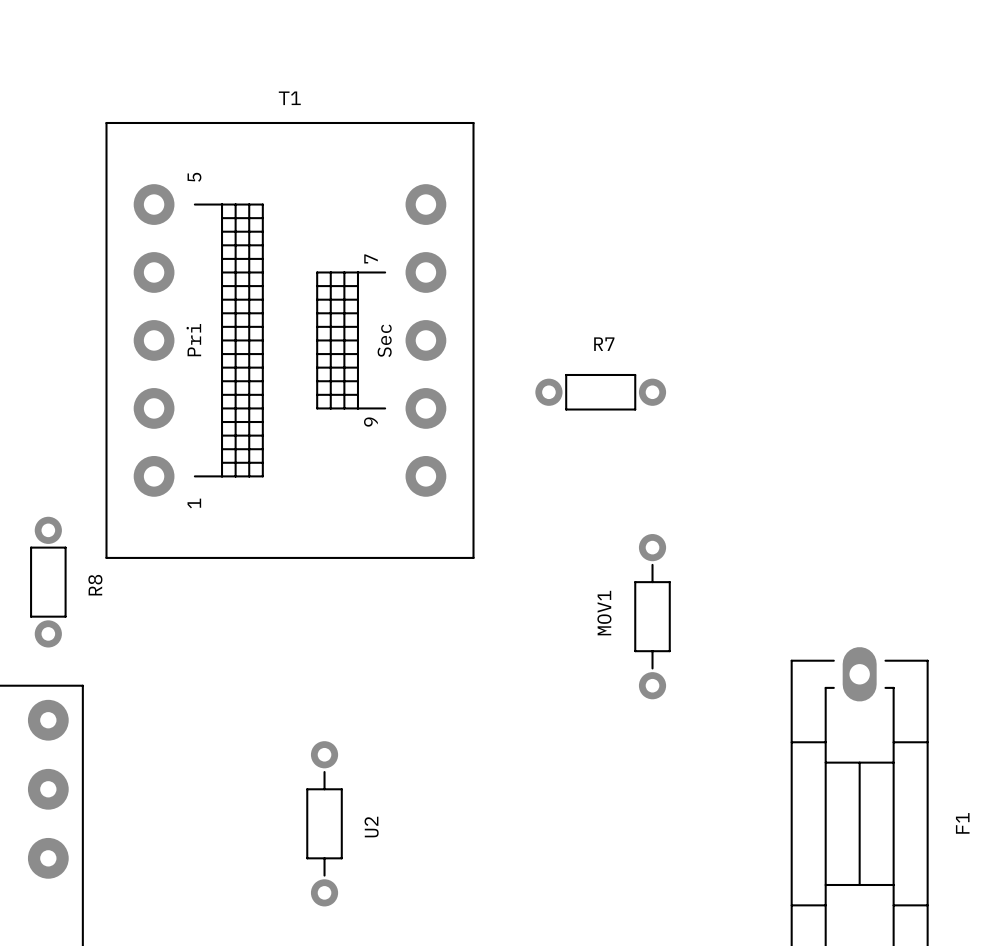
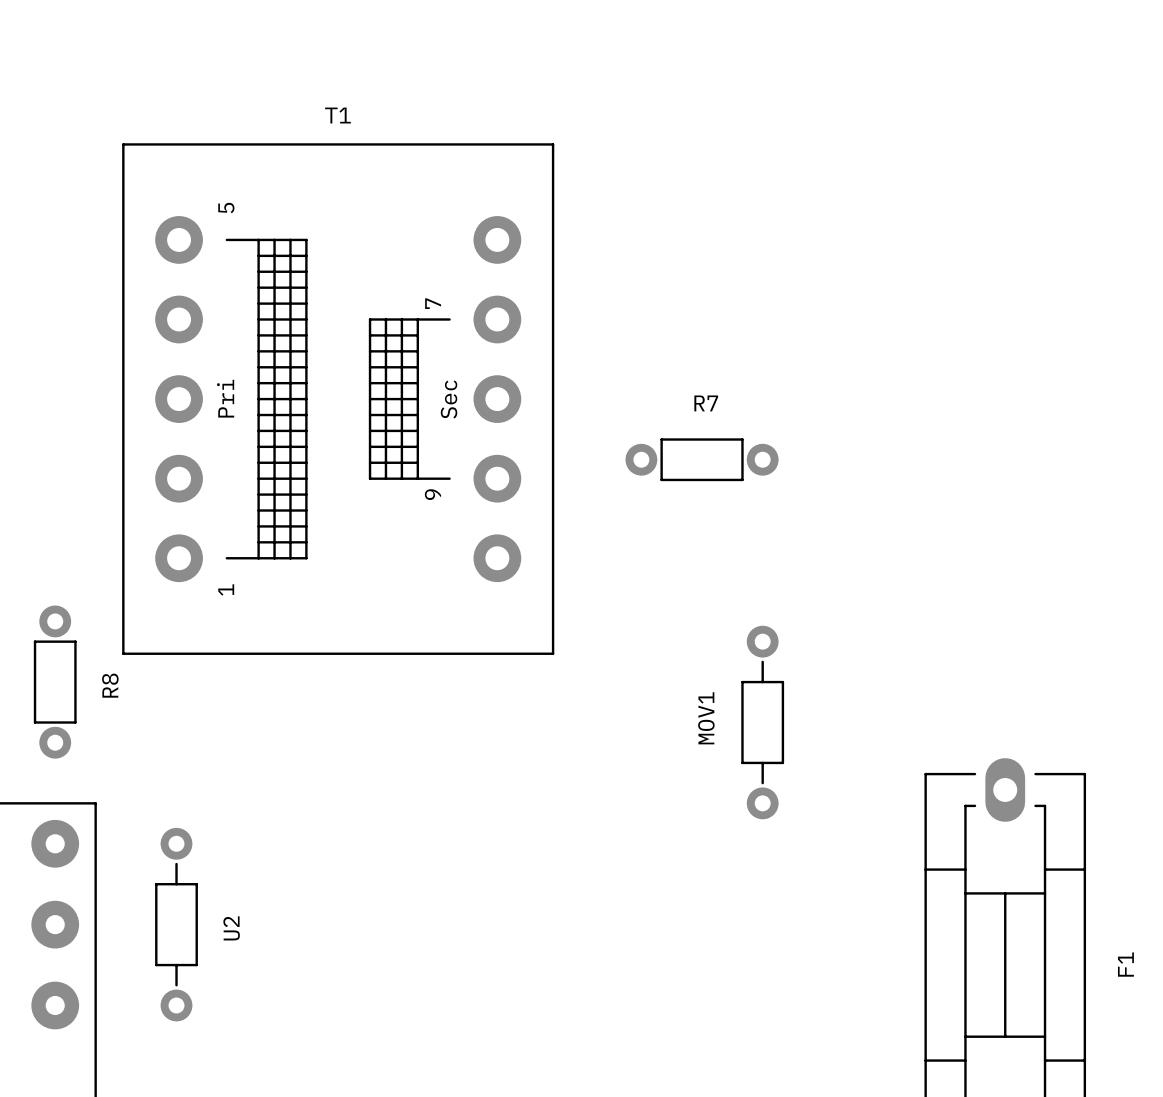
U2 position: (324, 823) -> (176, 924)

